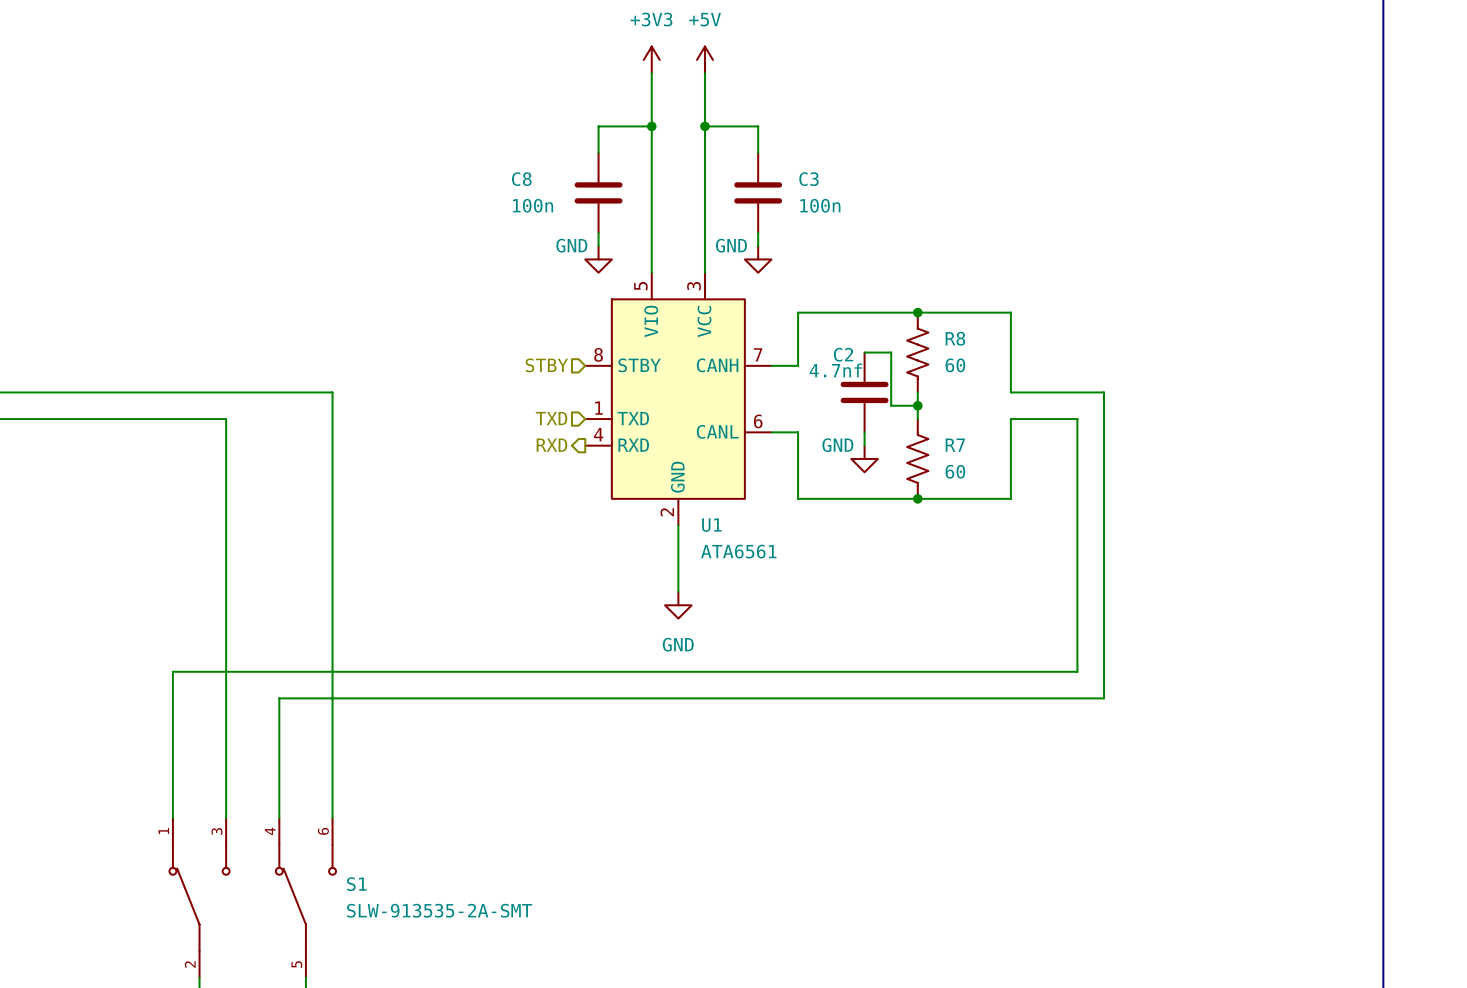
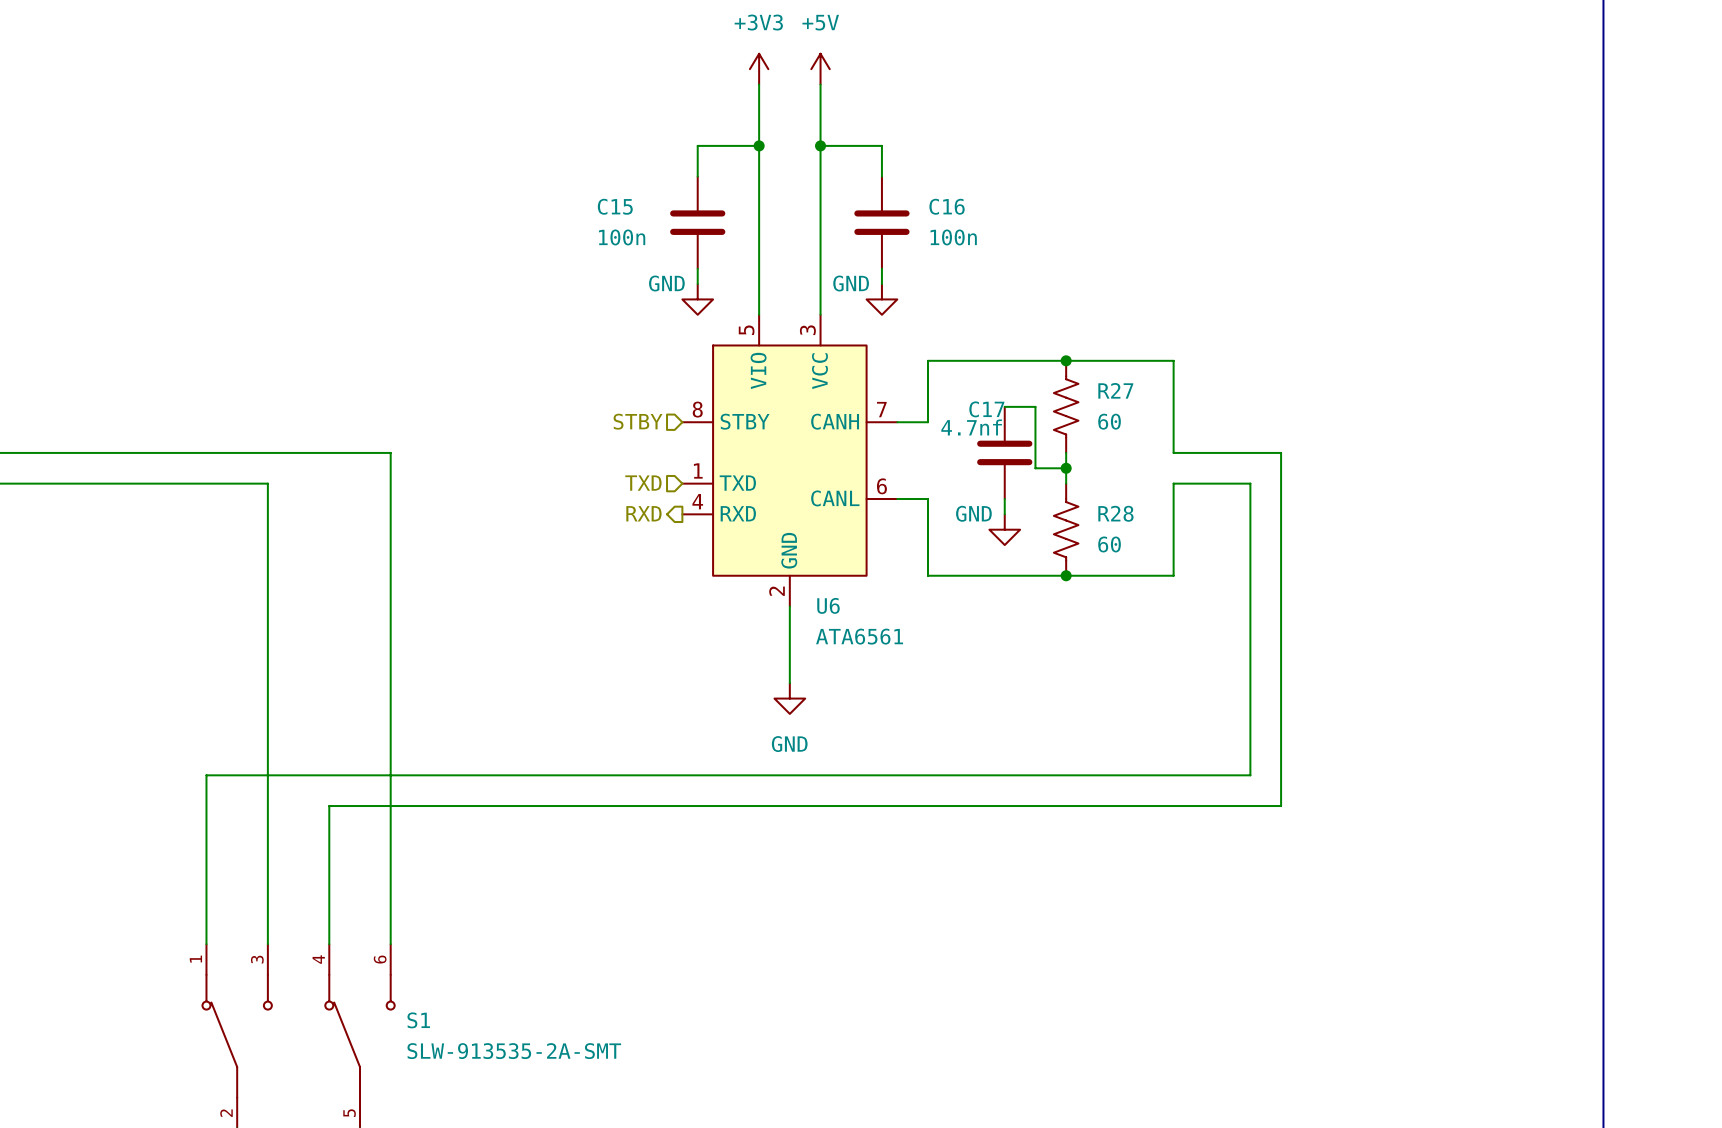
C8 name: C8 (521, 179) -> C15 (615, 206)
C3 name: C3 (808, 179) -> C16 (947, 206)
R8 name: R8 (955, 338) -> R27 (1115, 390)
C2 name: C2 (843, 354) -> C17 (986, 409)
R7 name: R7 (955, 445) -> R28 (1115, 513)
U1 name: U1 (711, 525) -> U6 (828, 605)

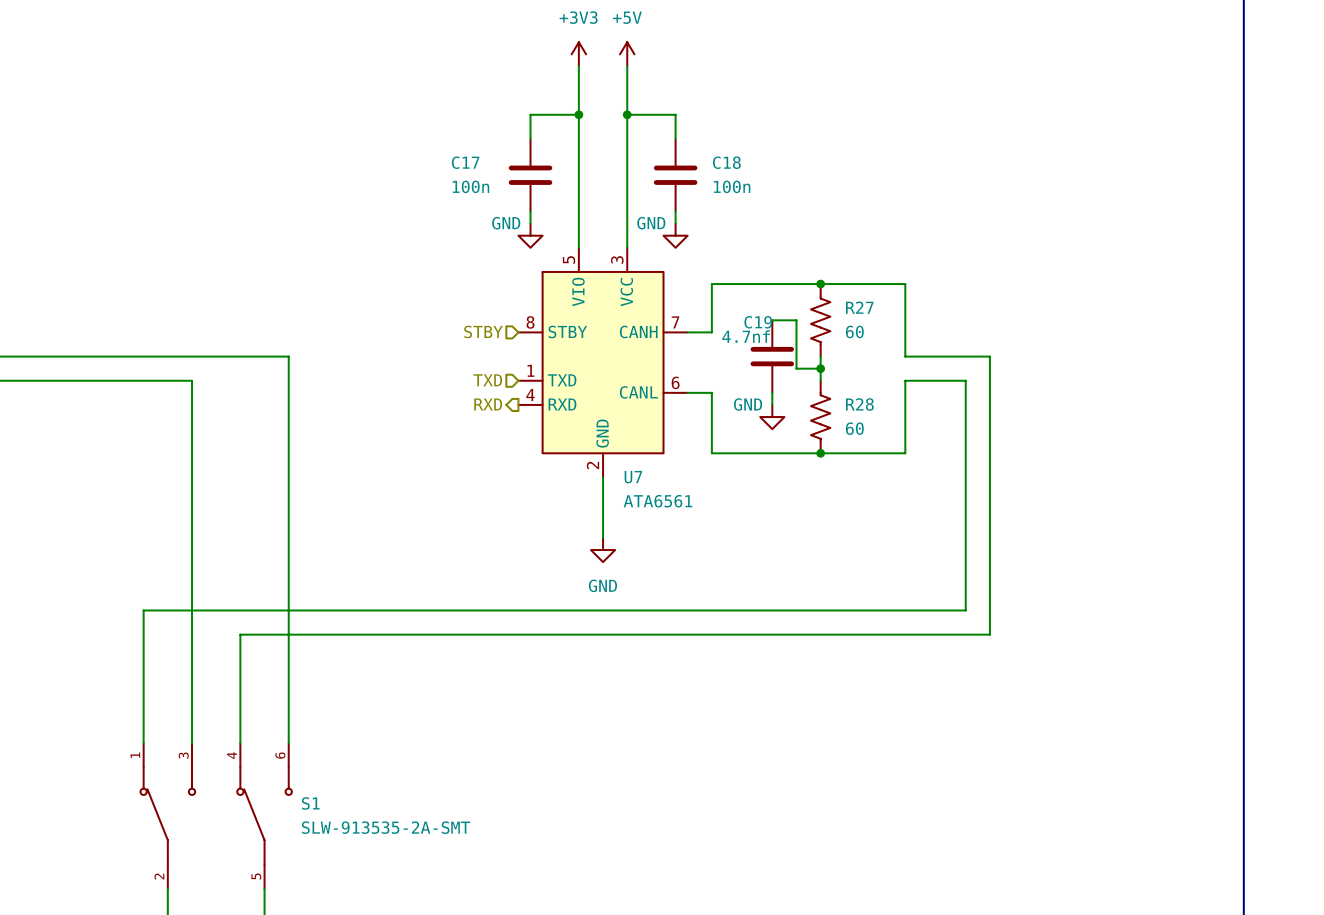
C15 name: C15 (615, 206) -> C17 (465, 162)
C16 name: C16 (947, 206) -> C18 (726, 162)
C17 name: C17 (986, 409) -> C19 (758, 322)
U6 name: U6 (828, 605) -> U7 (633, 477)

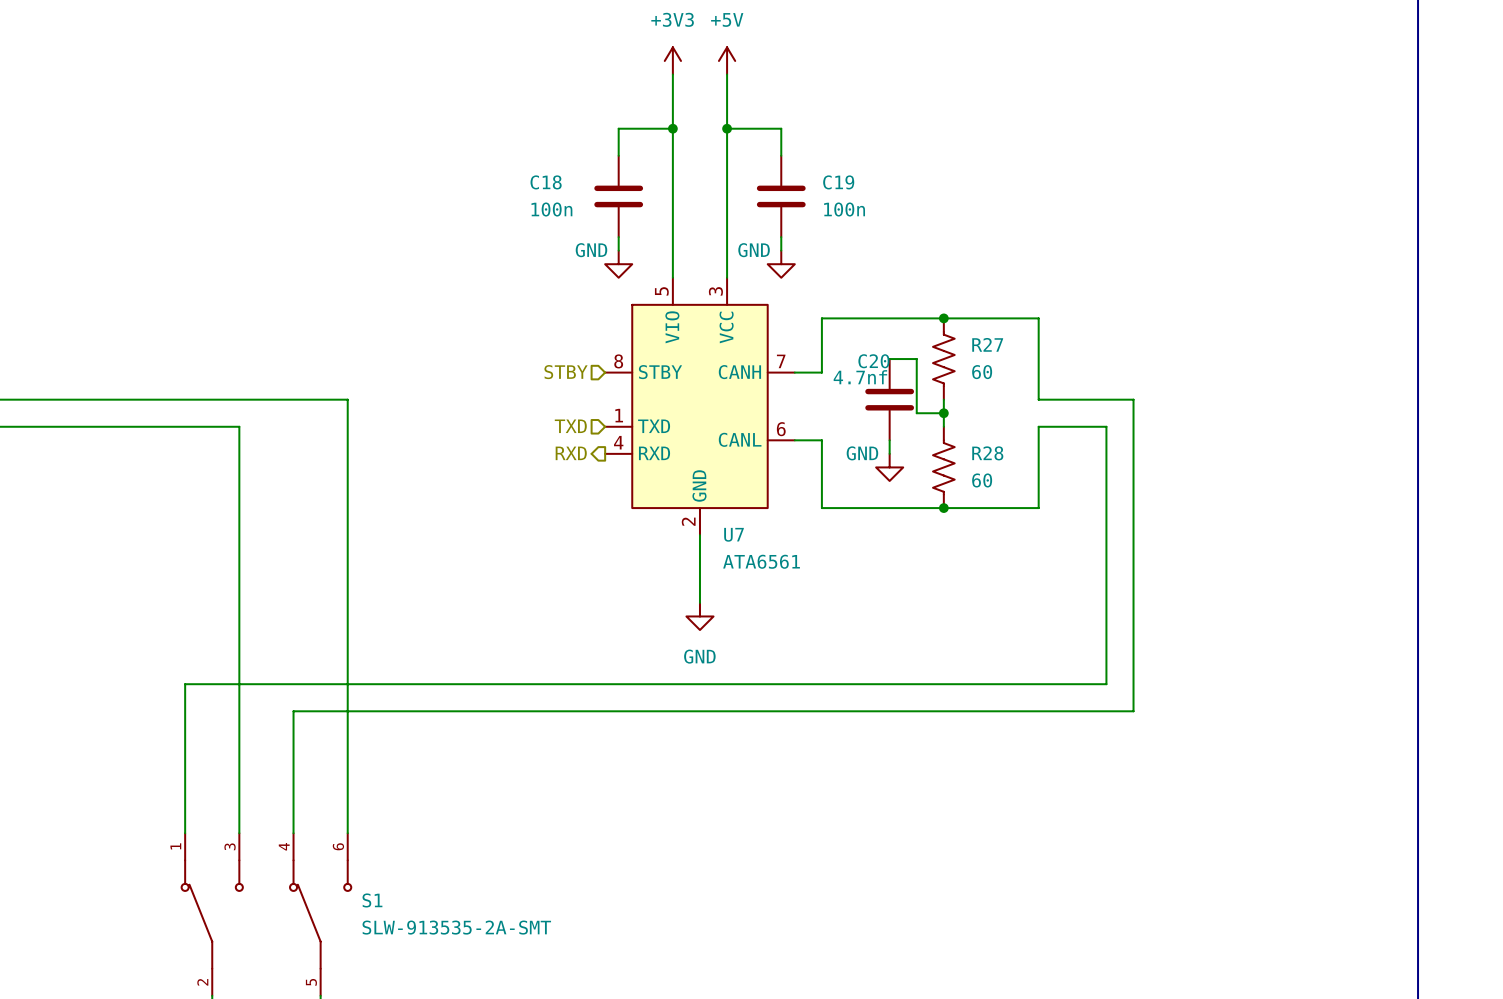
C17 name: C17 (465, 162) -> C18 (546, 182)
C18 name: C18 (726, 162) -> C19 (838, 182)
C19 name: C19 (758, 322) -> C20 (873, 361)

